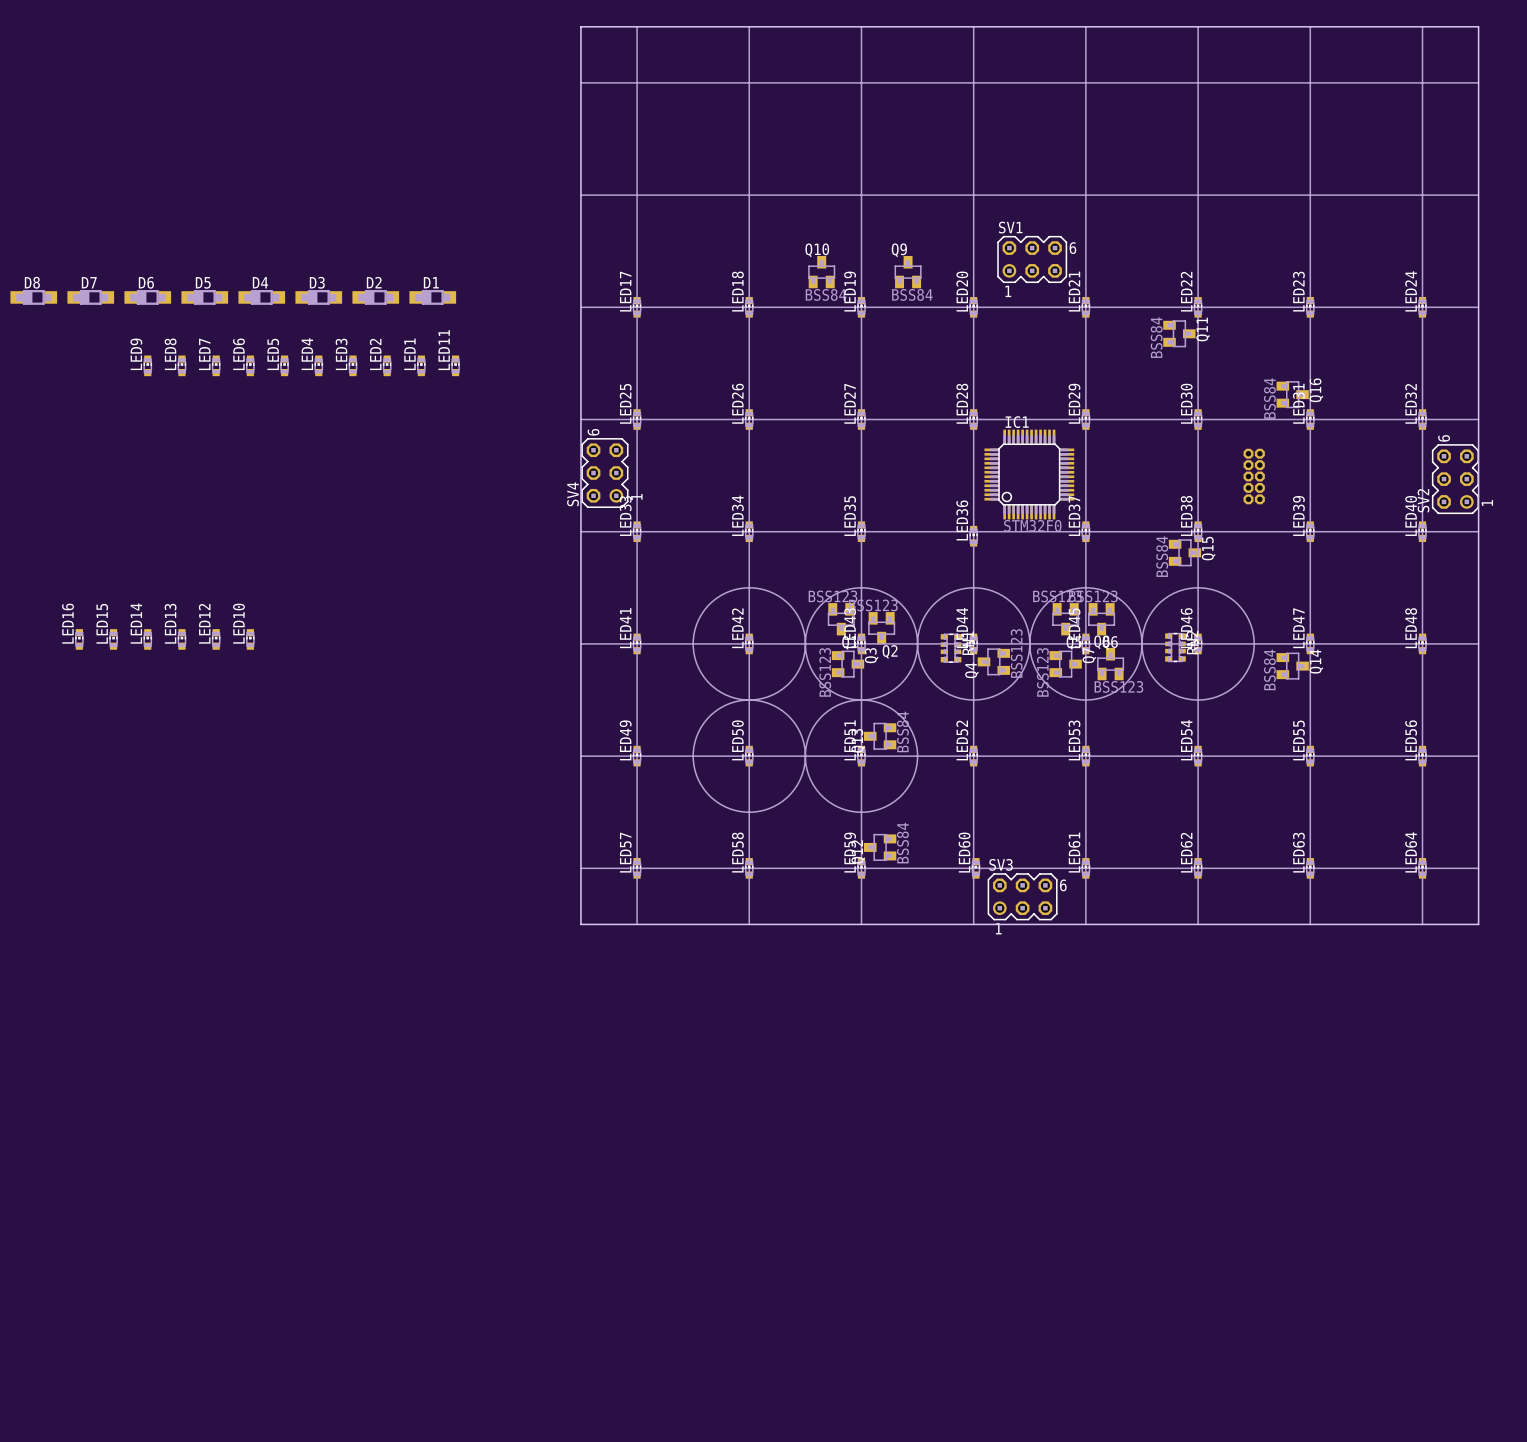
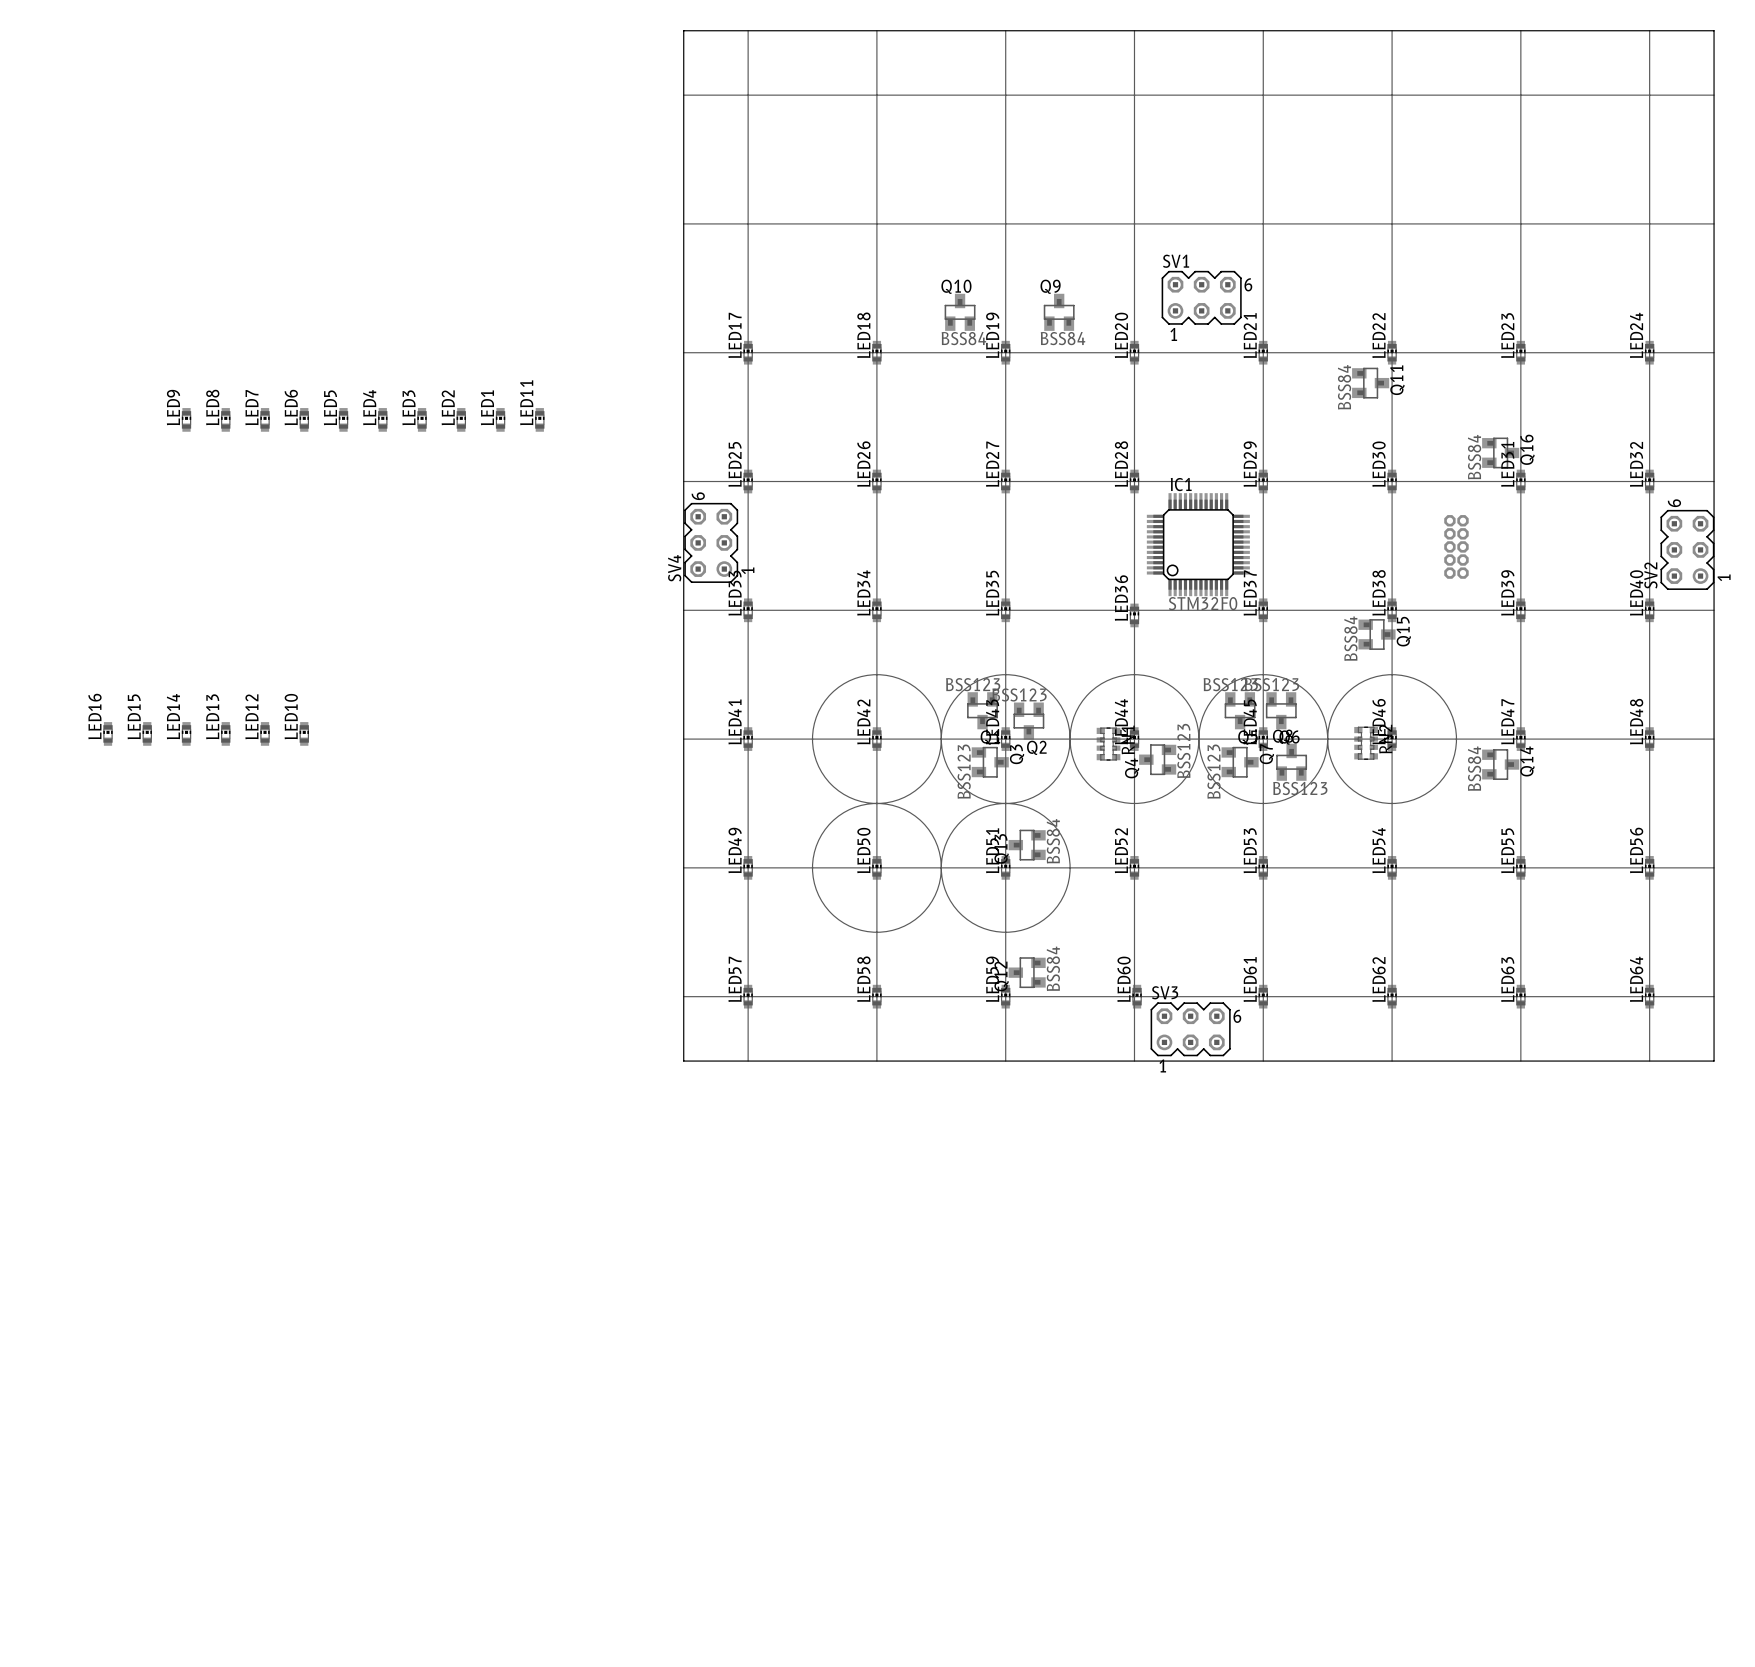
D8: (33, 297) -> none
D7: (90, 297) -> none
D6: (147, 297) -> none
D5: (204, 297) -> none
D4: (261, 297) -> none
D3: (318, 297) -> none
D2: (375, 297) -> none
D1: (432, 297) -> none

